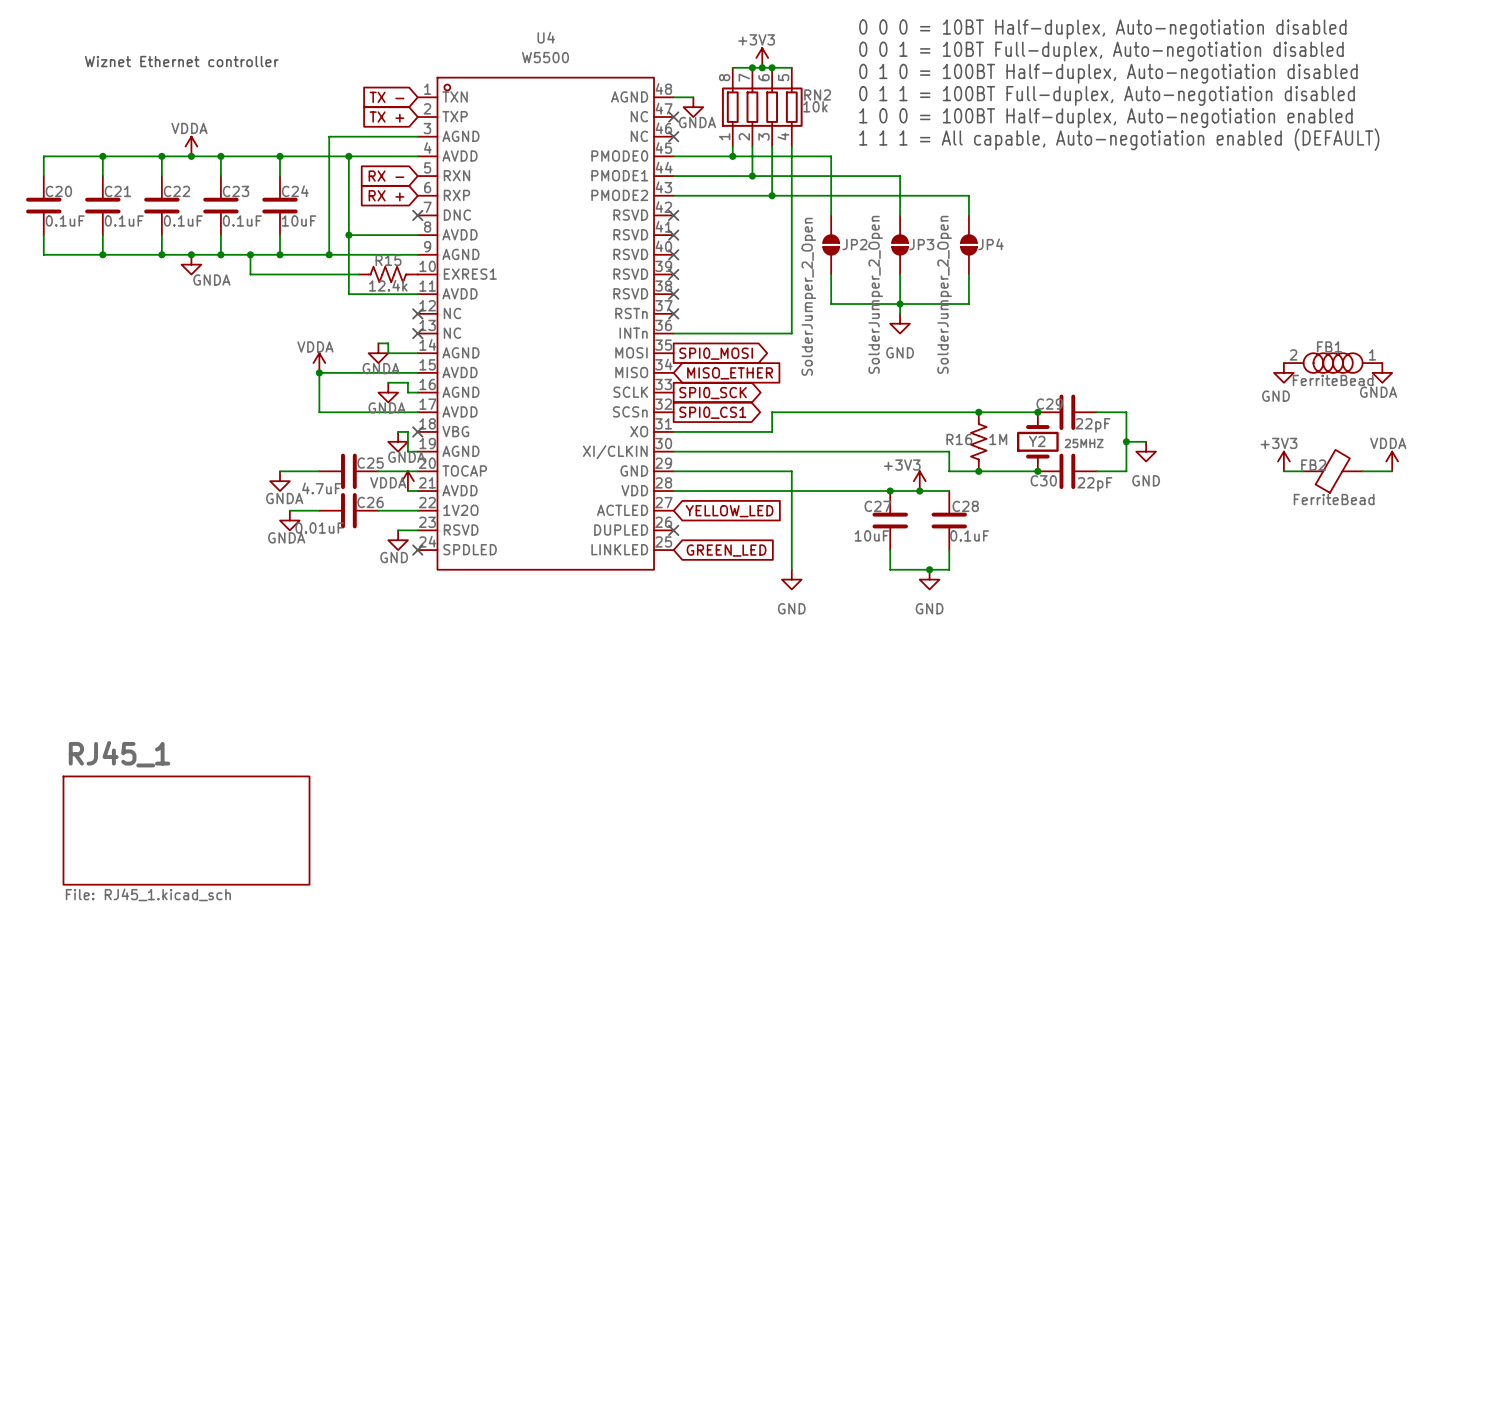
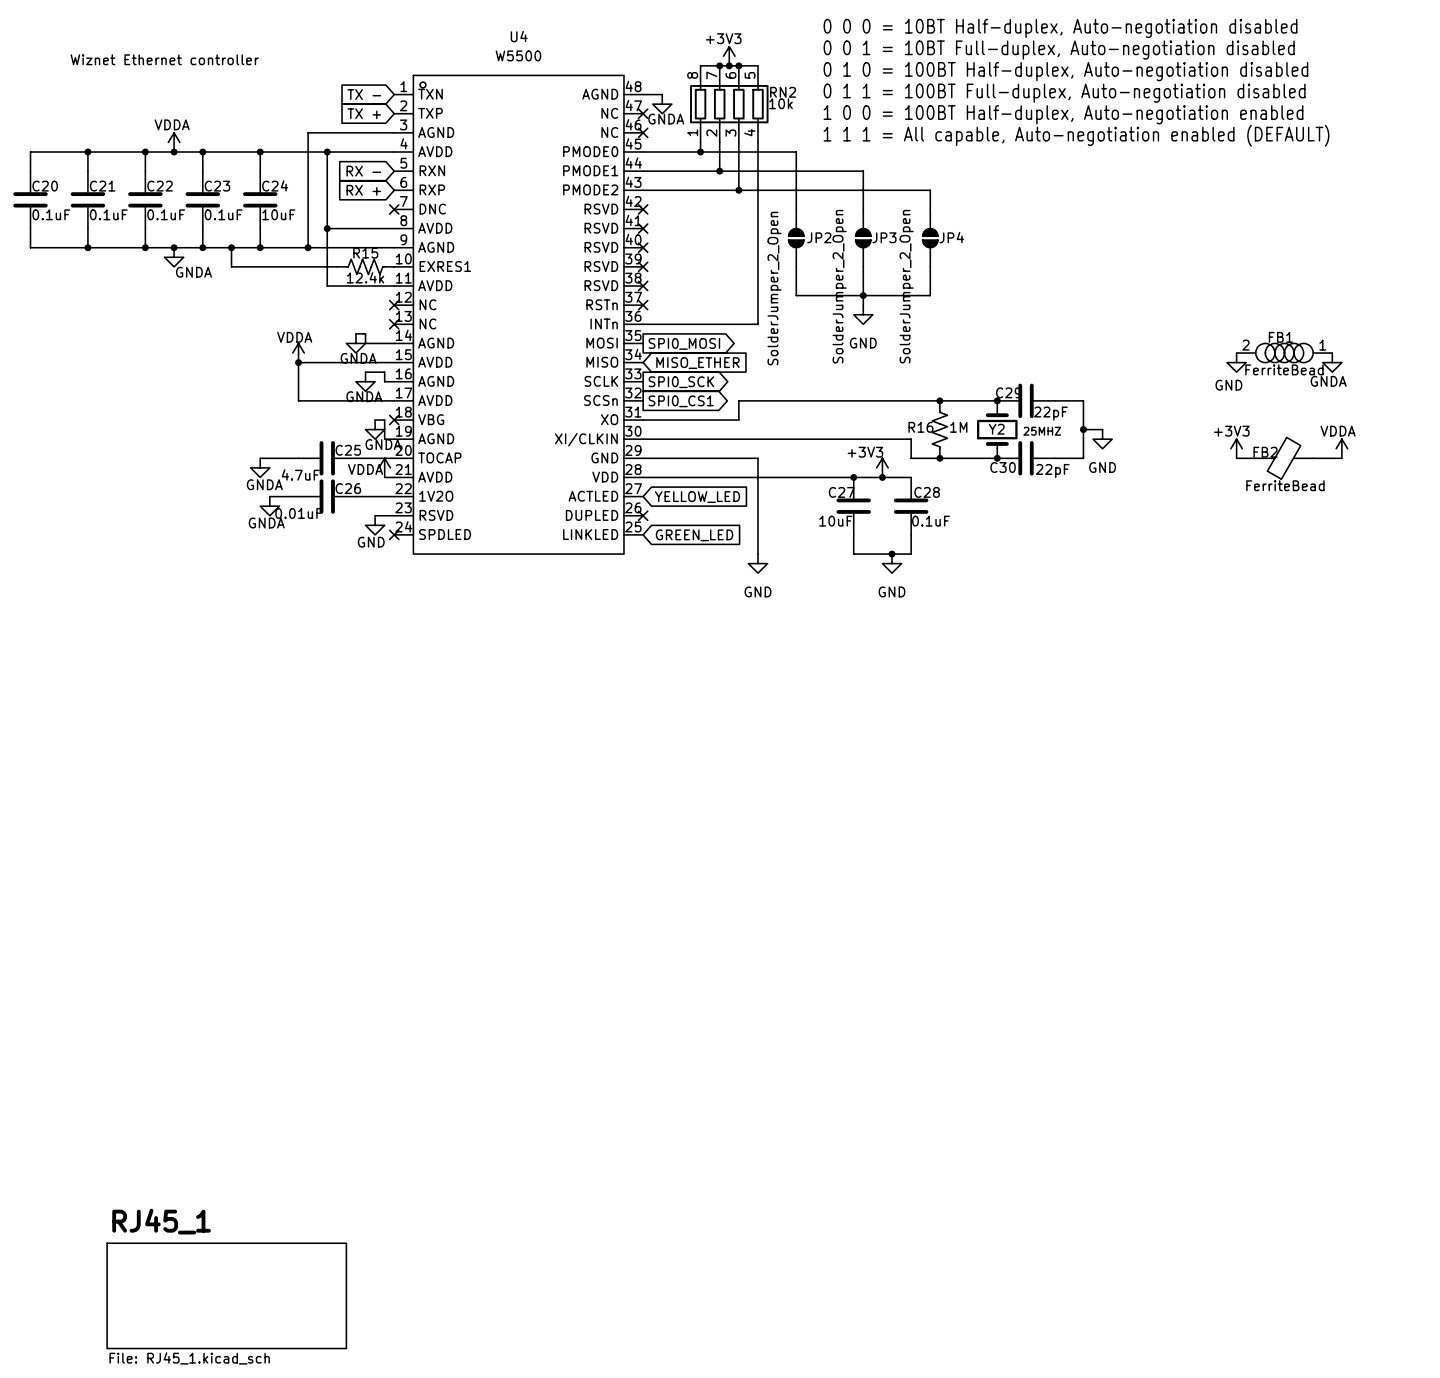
sheet RJ45_1 position: (186, 830) -> (226, 1295)

